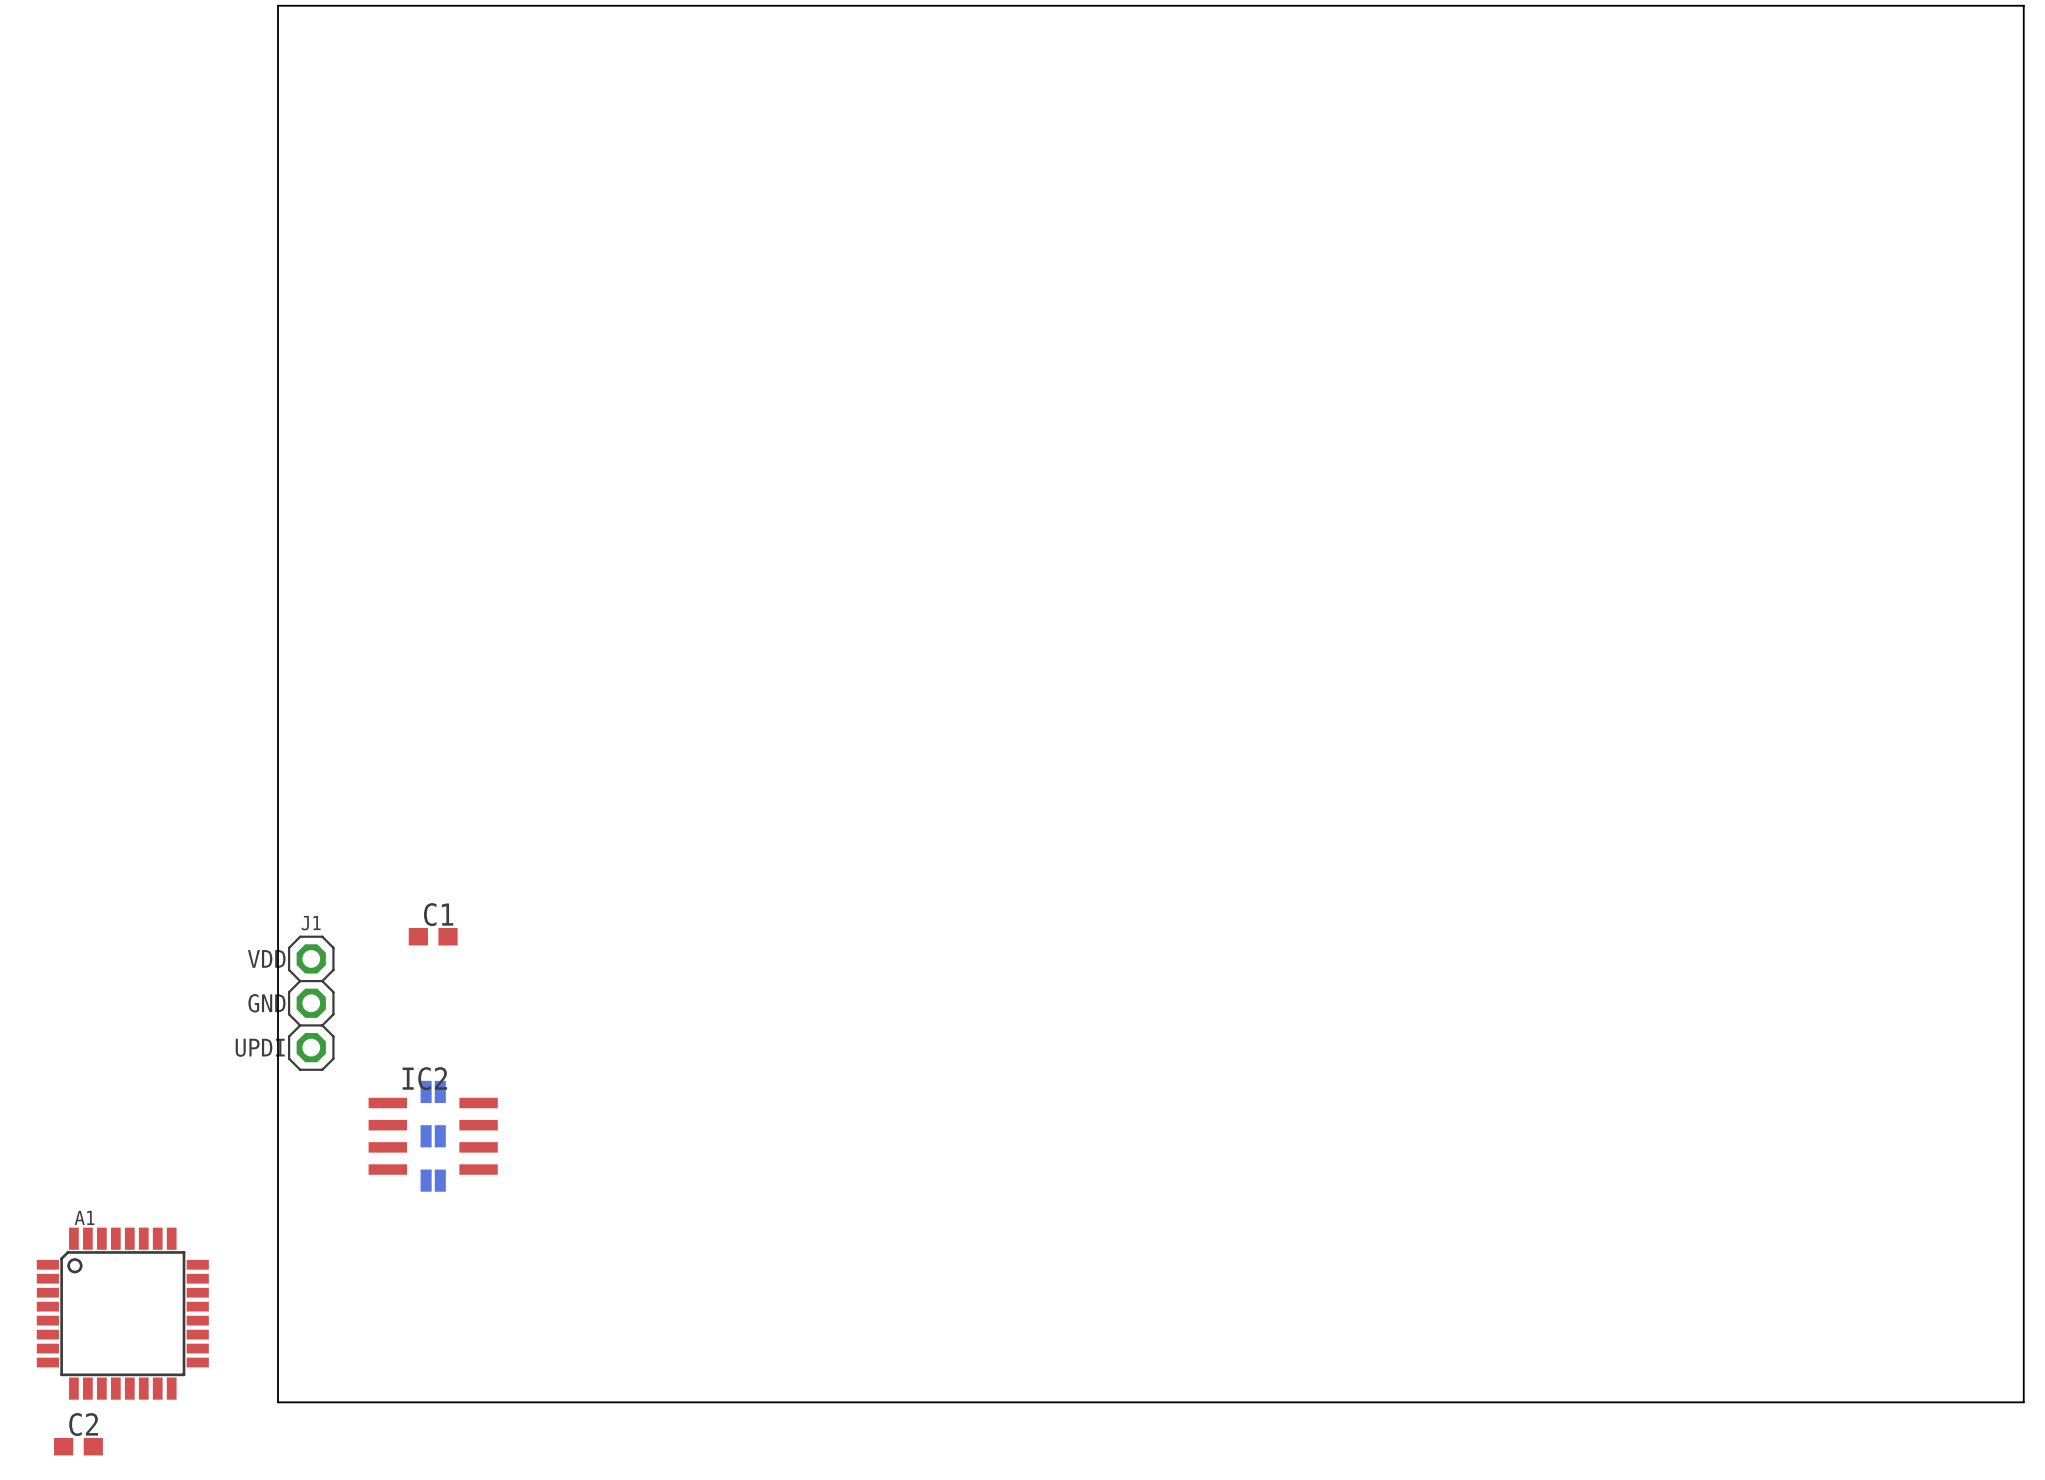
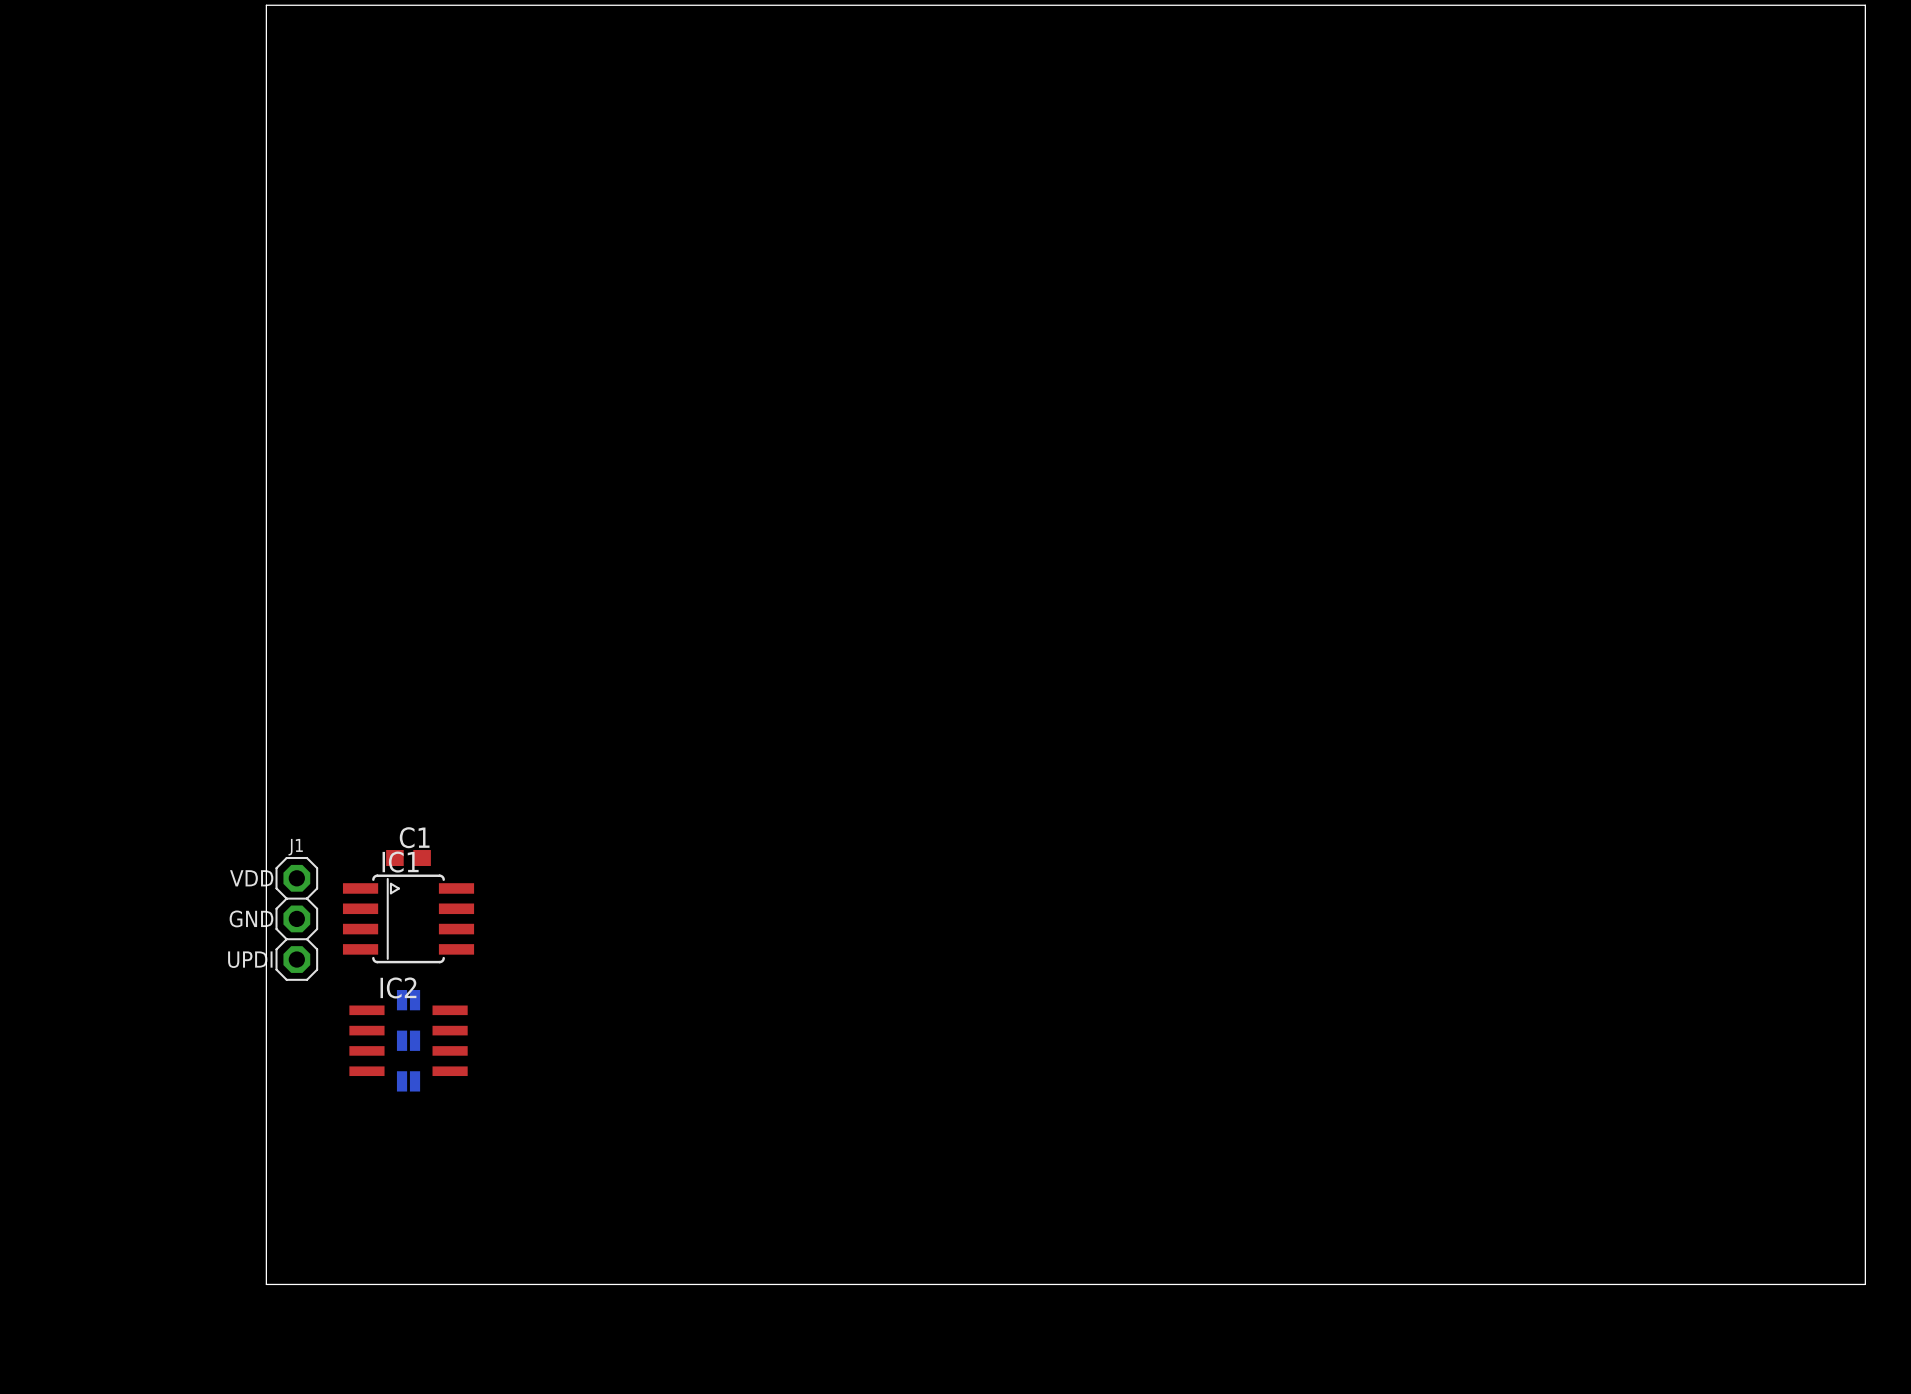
IC1: none -> (408, 918)
A1: (122, 1313) -> none
C2: (78, 1446) -> none

